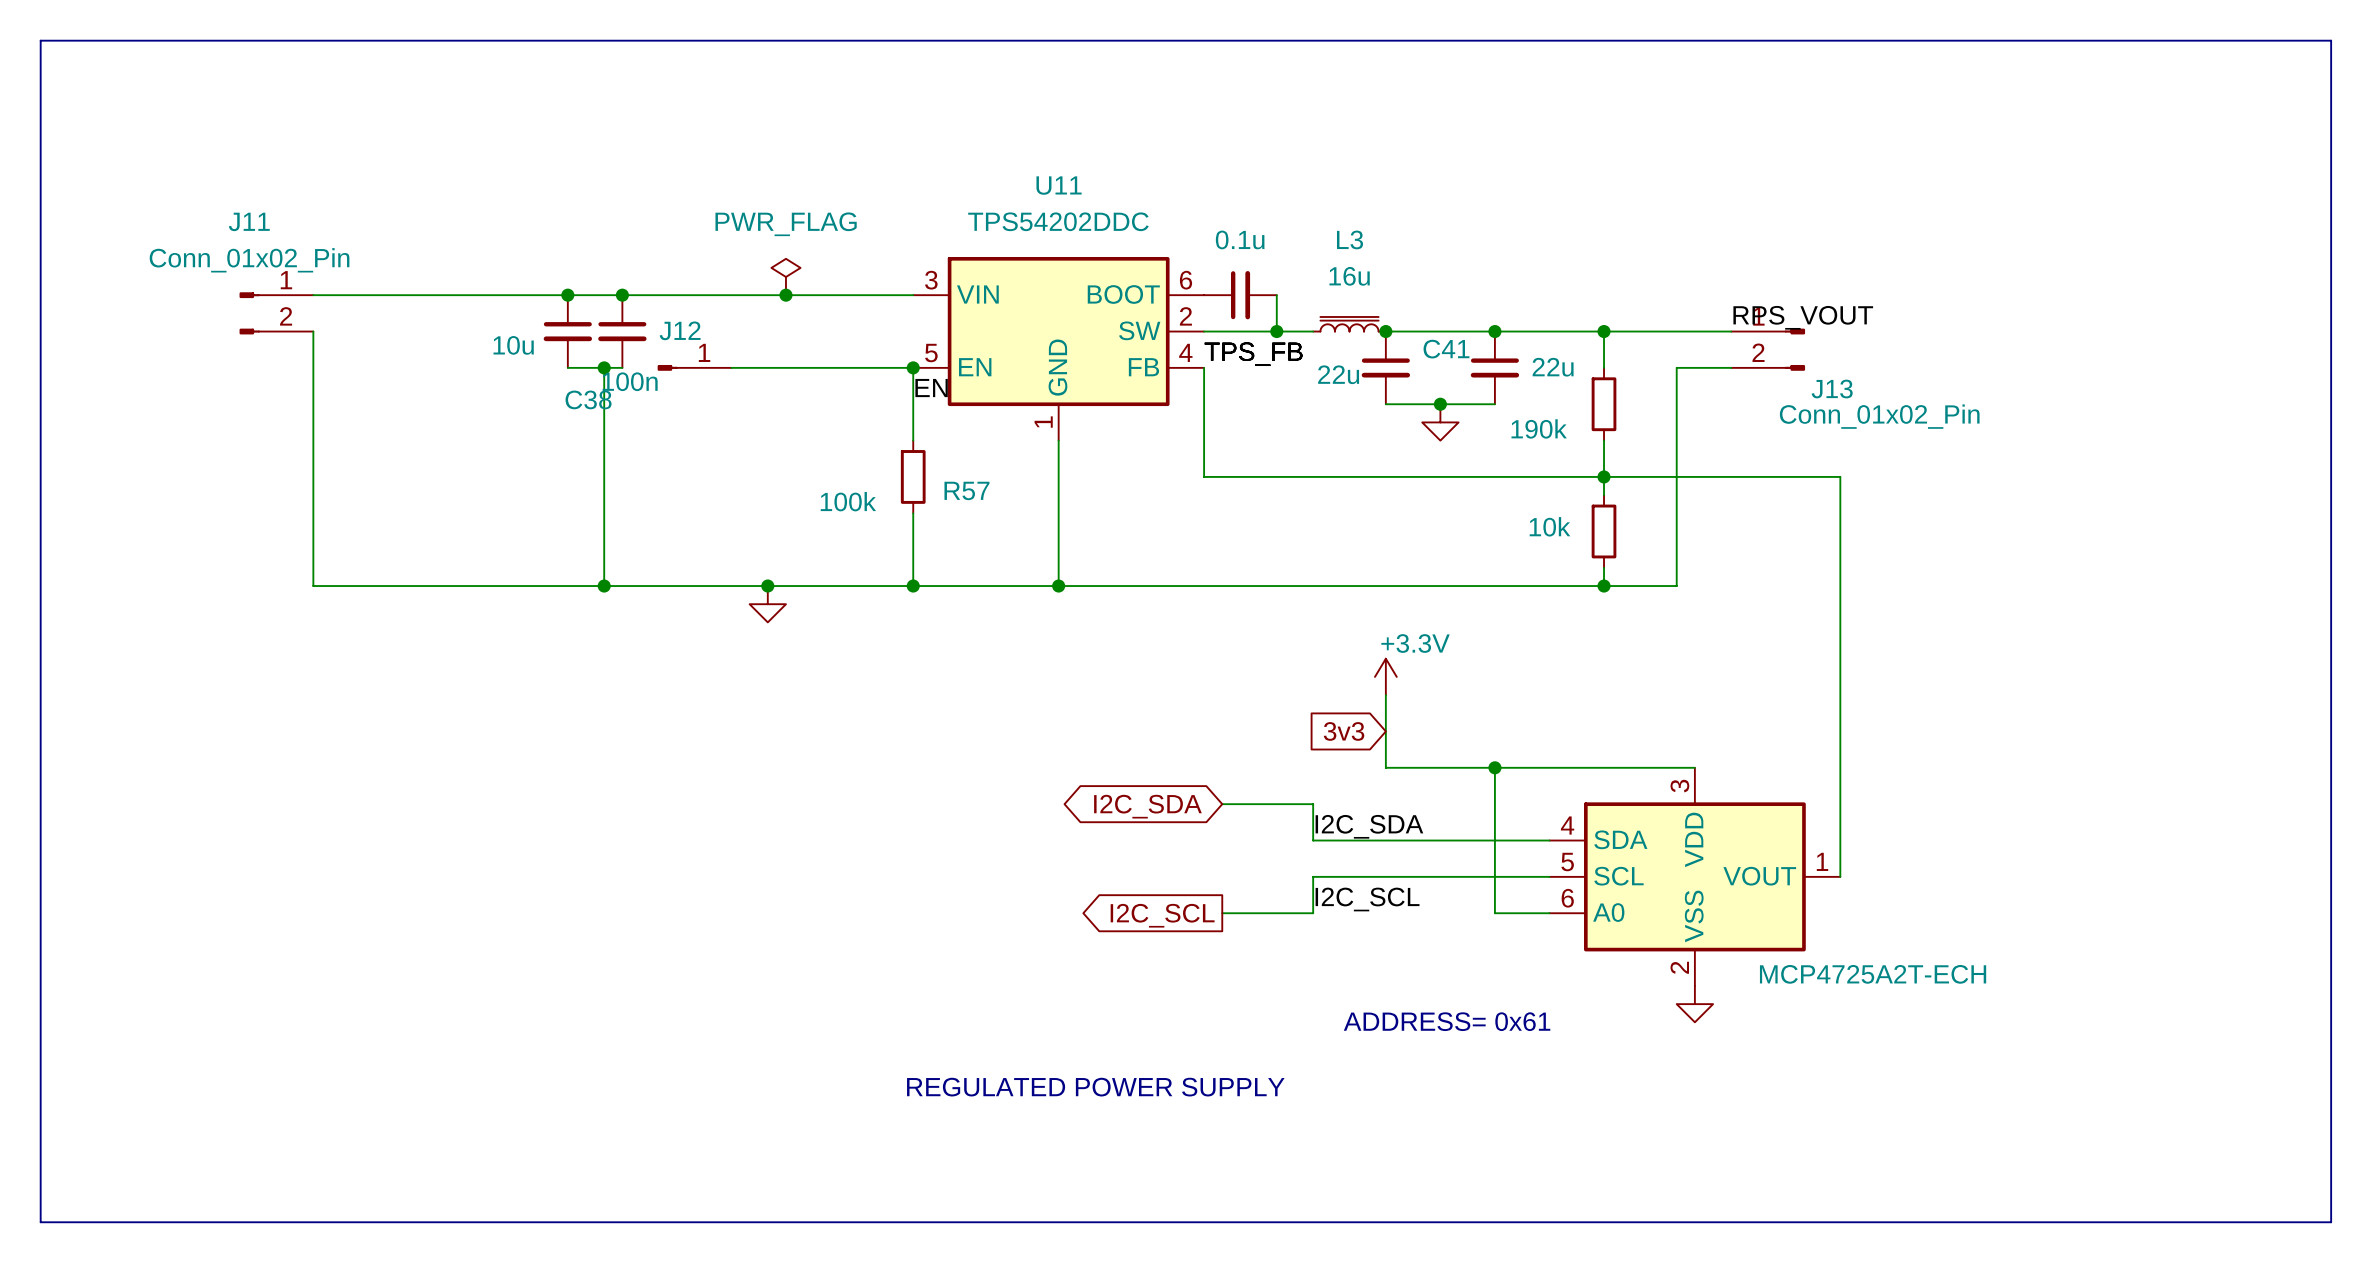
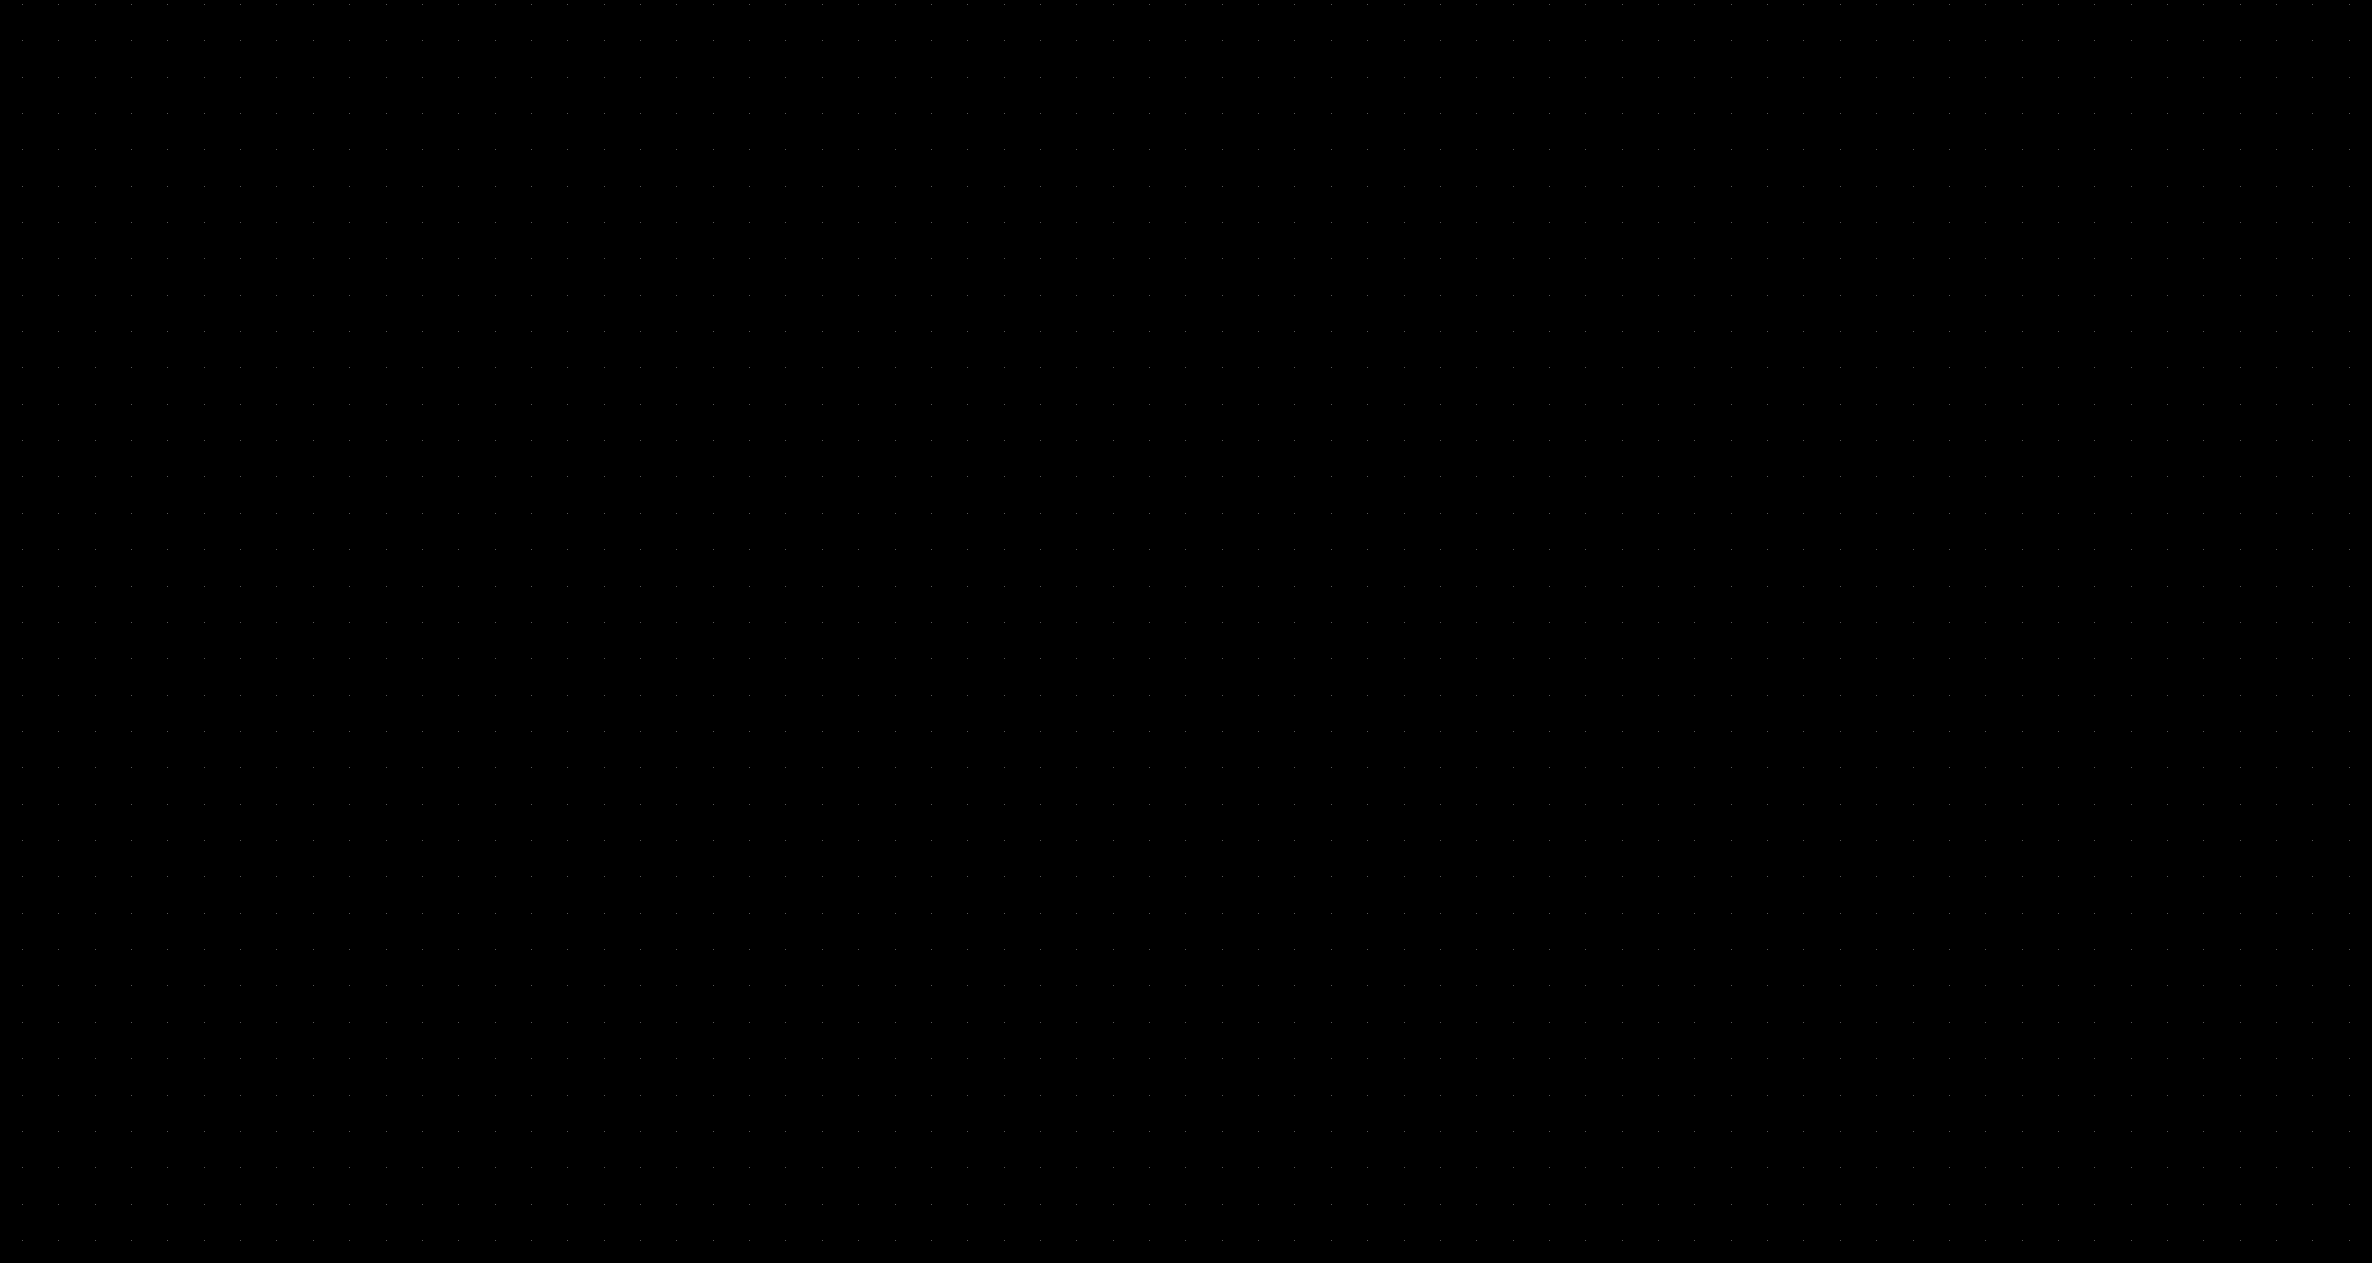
line: (40, 40) (2331, 40) (2331, 1222) (40, 1222) (40, 40) -> none
power symbol: PWR_FLAG (785, 276) -> none
wire: (313, 295) (913, 295) -> none
junction: (567, 295) -> none
junction: (622, 295) -> none
junction: (785, 295) -> none
part: 0.1u (1240, 295) -> none
wire: (1276, 295) (1276, 331) -> none
J11: Conn_01x02_Pin (276, 313) -> none
label: RPS_VOUT (1803, 317) -> none
L3: 16u (1349, 324) -> none
wire: (313, 331) (313, 586) (1676, 586) (1676, 367) (1731, 367) -> none
C38: 10u (567, 331) -> none
part: 100n (622, 331) -> none
wire: (1204, 331) (1313, 331) -> none
junction: (1276, 331) -> none
wire: (1385, 331) (1731, 331) -> none
junction: (1385, 331) -> none
junction: (1494, 331) -> none
wire: (1604, 331) (1604, 367) -> none
junction: (1604, 331) -> none
U11: TPS54202DDC (1058, 348) -> none
J13: Conn_01x02_Pin (1768, 349) -> none
label: TPS_FB (1253, 354) -> none
wire: (567, 367) (622, 367) -> none
wire: (604, 367) (604, 586) -> none
junction: (604, 367) -> none
J12: (694, 367) -> none
wire: (731, 367) (913, 367) (913, 440) -> none
junction: (913, 367) -> none
wire: (1204, 367) (1204, 476) (1840, 476) (1840, 876) -> none
C41: 22u (1385, 367) -> none
part: 22u (1494, 367) -> none
label: EN (931, 388) -> none
wire: (1385, 404) (1494, 404) -> none
junction: (1440, 404) -> none
part: 190k (1604, 404) -> none
power symbol: (1440, 422) -> none
wire: (1058, 440) (1058, 586) -> none
wire: (1604, 440) (1604, 495) -> none
R57: 100k (913, 476) -> none
junction: (1604, 476) -> none
wire: (913, 513) (913, 586) -> none
part: 10k (1604, 531) -> none
wire: (1604, 567) (1604, 586) -> none
junction: (604, 586) -> none
junction: (767, 586) -> none
junction: (913, 586) -> none
junction: (1058, 586) -> none
junction: (1604, 586) -> none
power symbol: (767, 604) -> none
power symbol: +3.3V (1385, 676) -> none
wire: (1385, 695) (1385, 767) (1694, 767) -> none
global label: 3v3 (1344, 731) -> none
wire: (1494, 767) (1494, 913) (1549, 913) -> none
junction: (1494, 767) -> none
wire: (1222, 804) (1313, 804) (1313, 840) (1549, 840) -> none
global label: I2C_SDA (1147, 806) -> none
label: I2C_SDA (1369, 826) -> none
wire: (1549, 876) (1313, 876) (1313, 913) (1222, 913) -> none
part: MCP4725A2T-ECH (1694, 876) -> none
label: I2C_SCL (1367, 899) -> none
global label: I2C_SCL (1162, 915) -> none
power symbol: (1694, 1004) -> none
text: ADDRESS= 0x61 (1447, 1021) -> none
text: REGULATED POWER SUPPLY (1095, 1087) -> none

